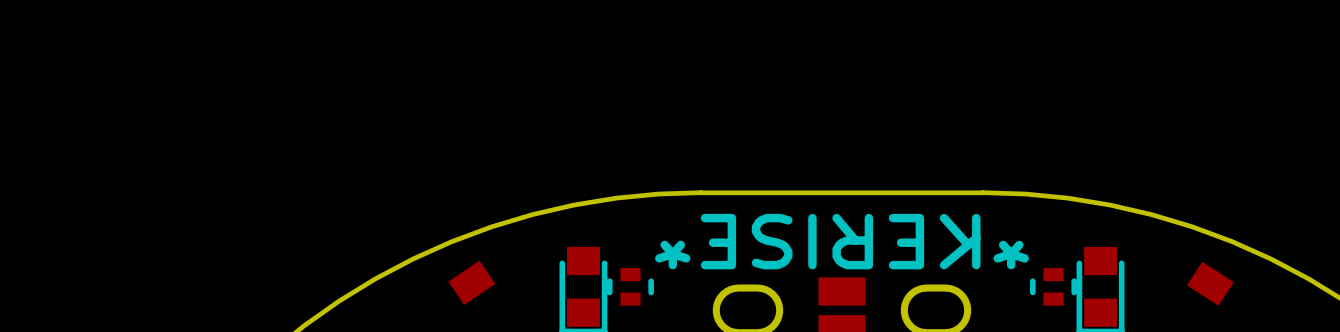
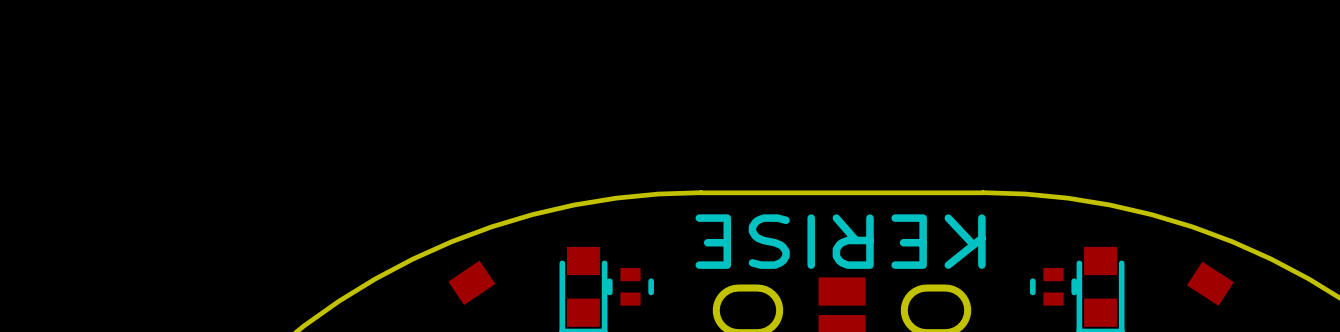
text: *KERISE* (841, 241) -> KERISE (840, 241)

